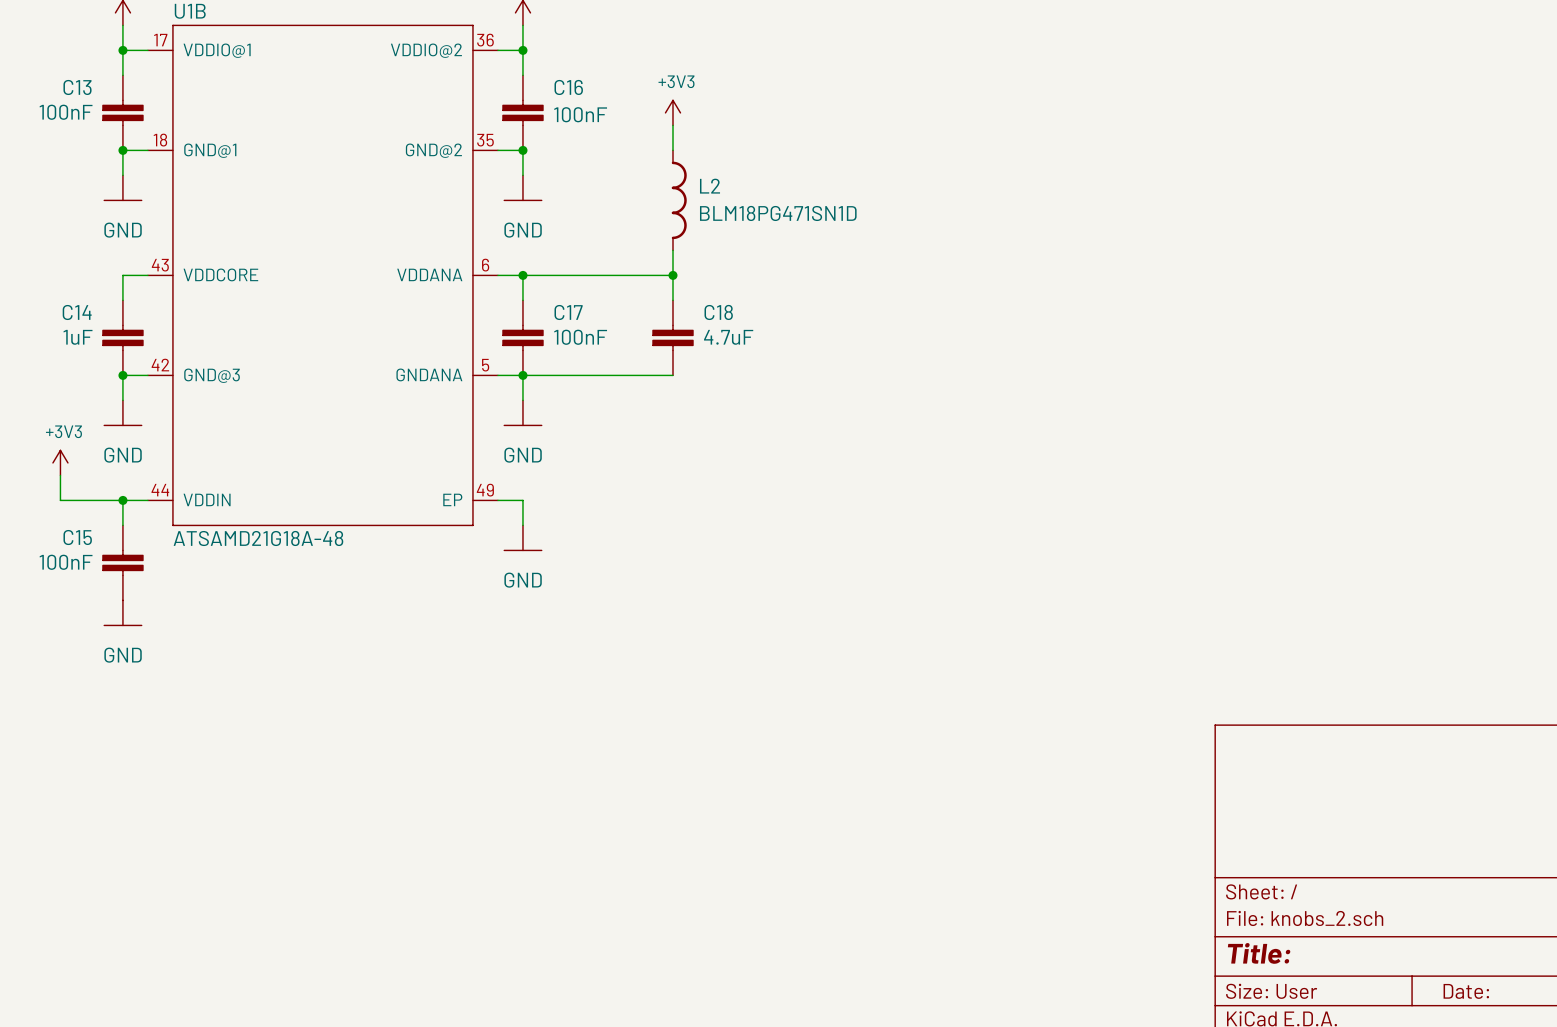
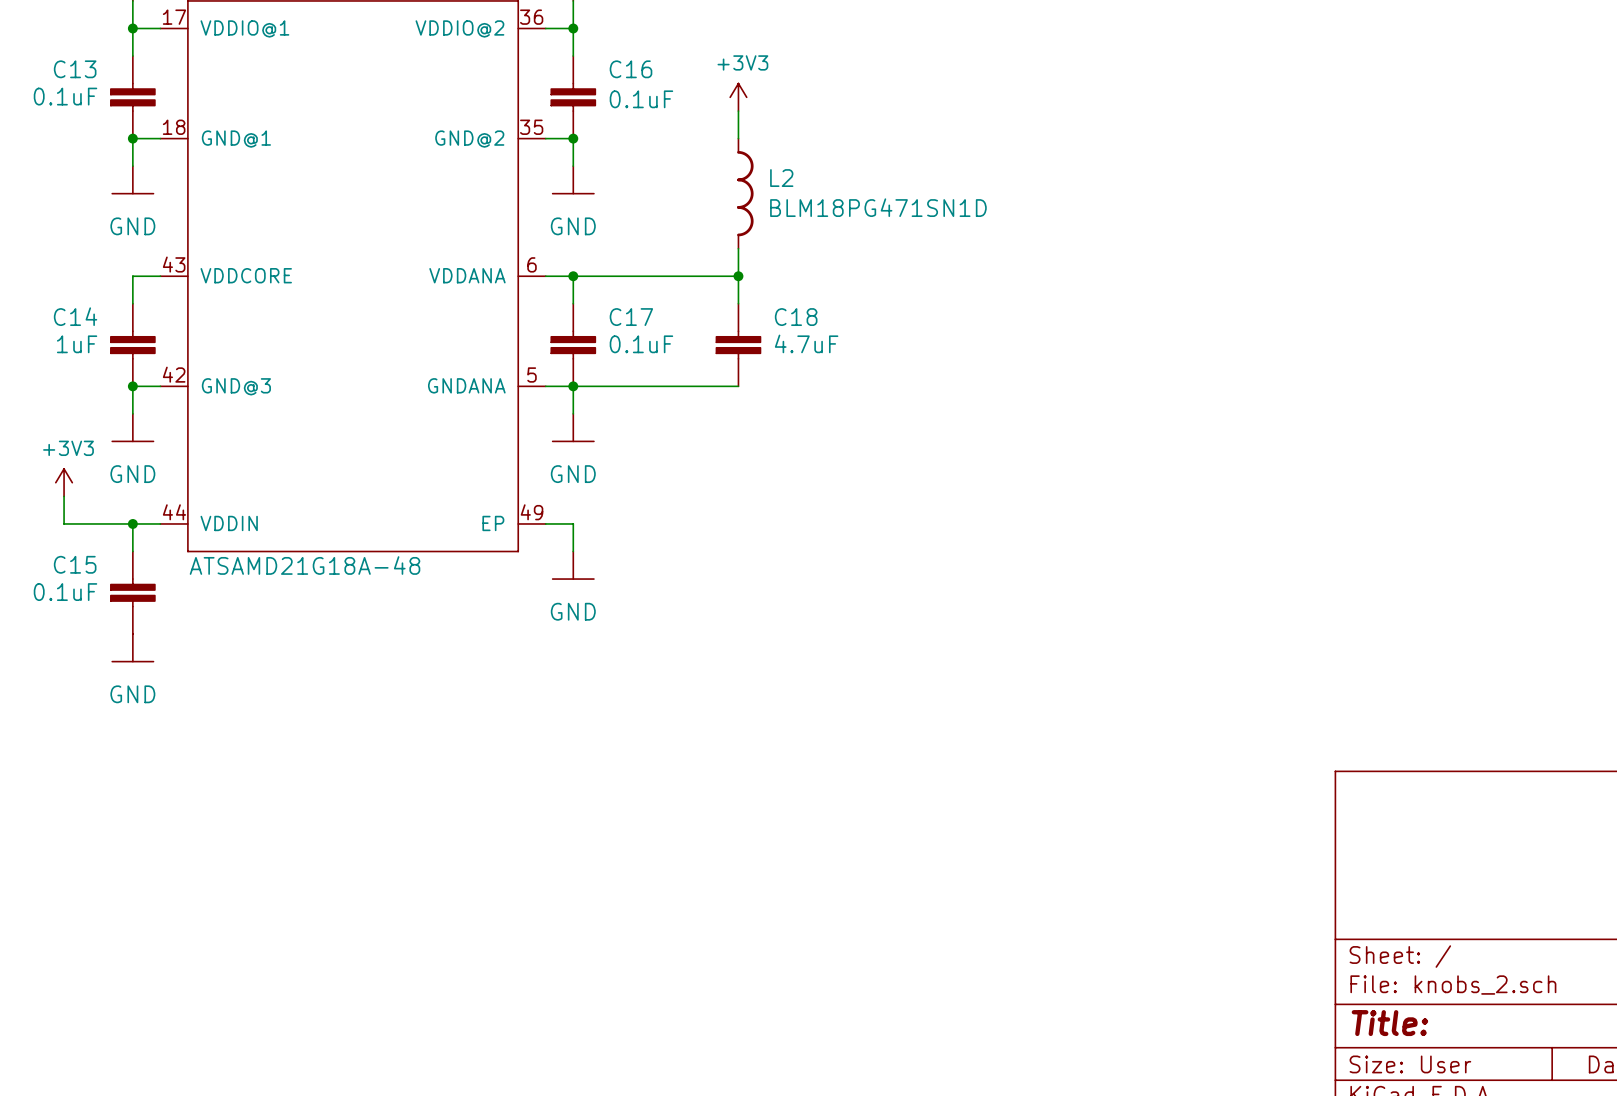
C13 value: 100nF (66, 112) -> 0.1uF (65, 96)
C16 value: 100nF (580, 114) -> 0.1uF (641, 99)
C17 value: 100nF (580, 337) -> 0.1uF (641, 344)
C15 value: 100nF (66, 562) -> 0.1uF (65, 592)

